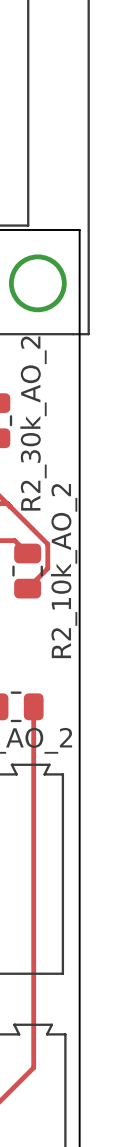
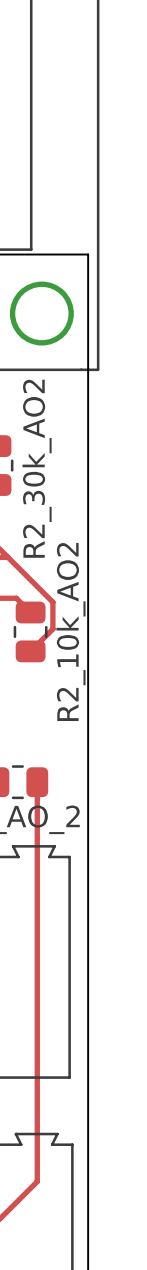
R2_30k_AO_2 name: R2_30k_AO_2 (33, 423) -> R2_30k_AO2 (37, 468)
R2_10k_AO_2 name: R2_10k_AO_2 (64, 571) -> R2_10k_AO2 (70, 631)

